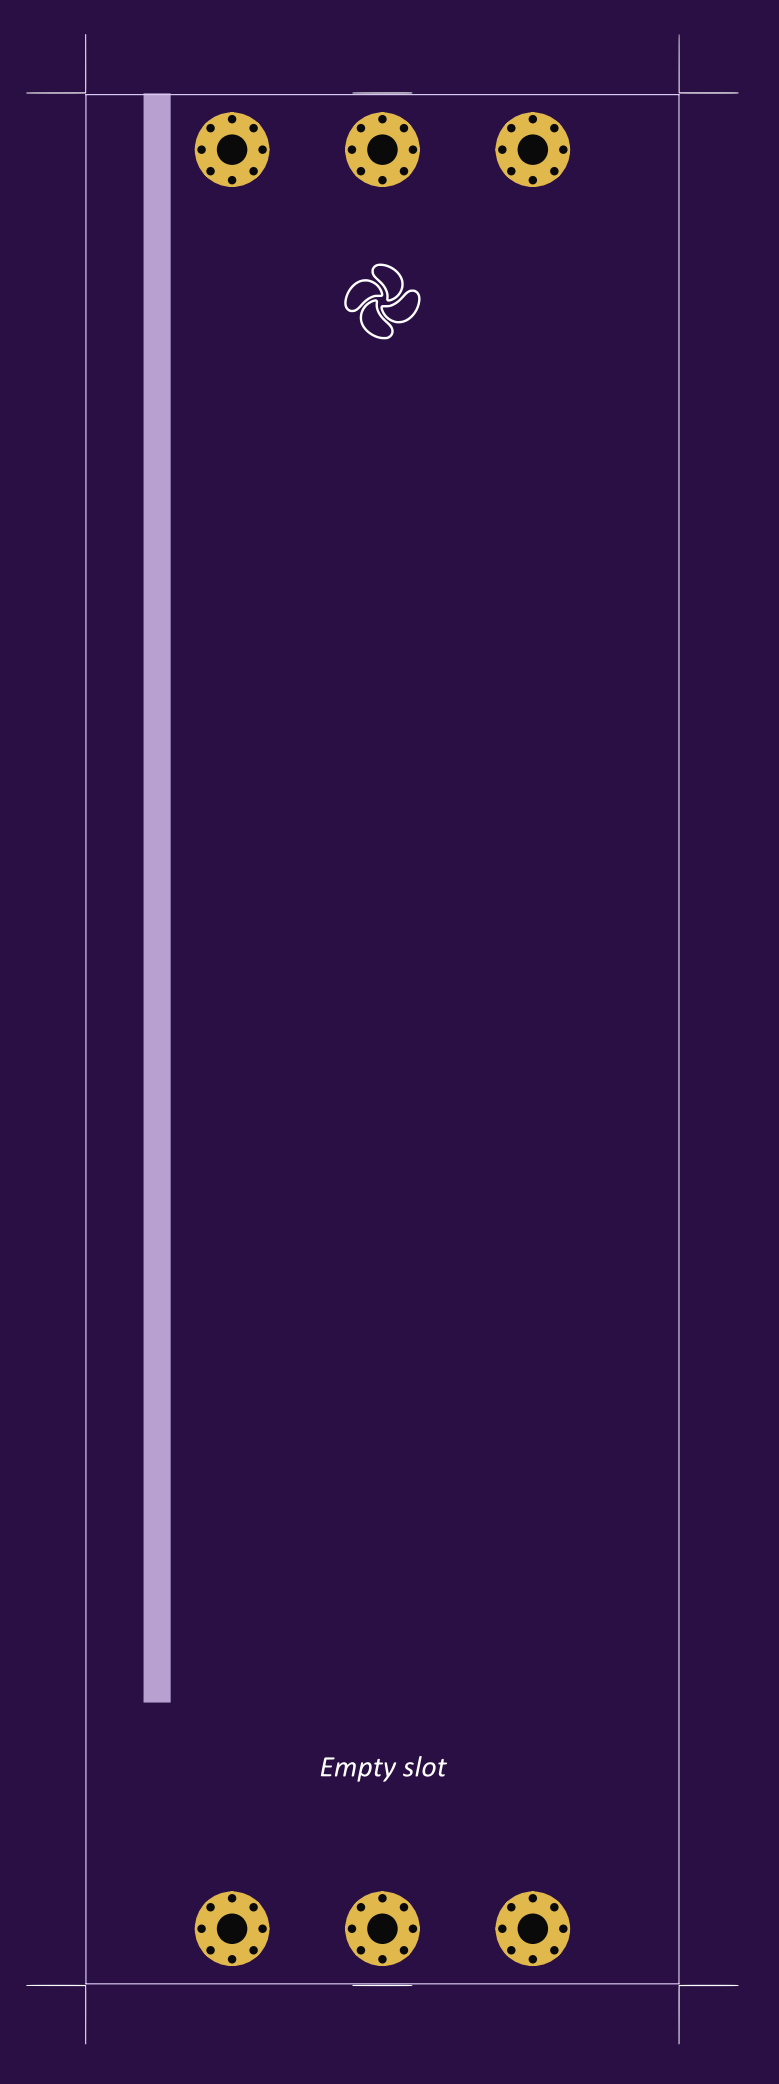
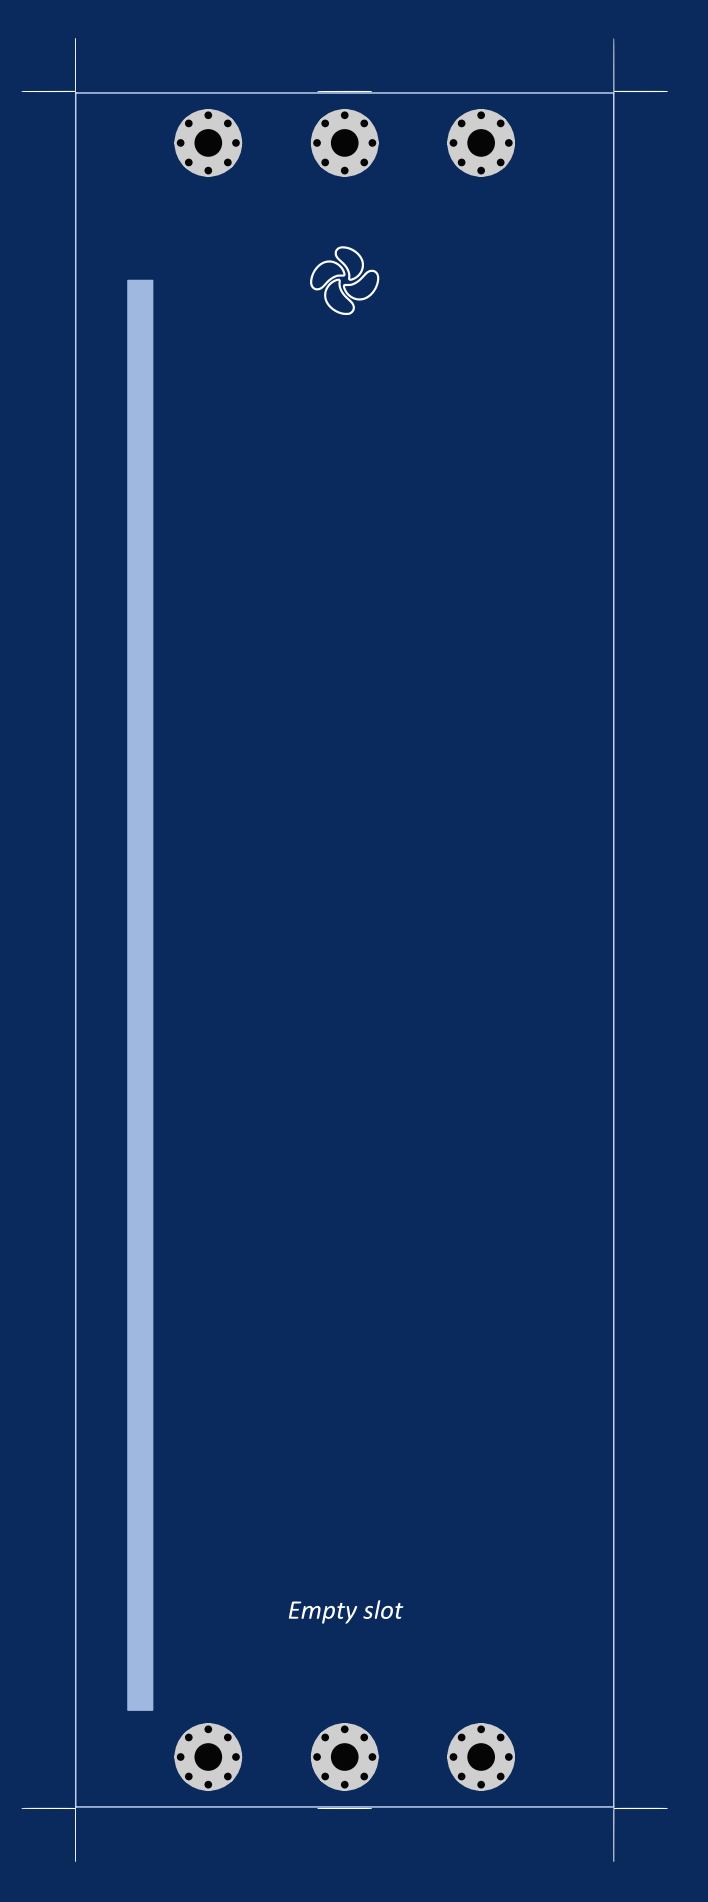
drawing: [143, 93, 171, 1703] -> none
drawing: none -> [127, 279, 154, 1711]

